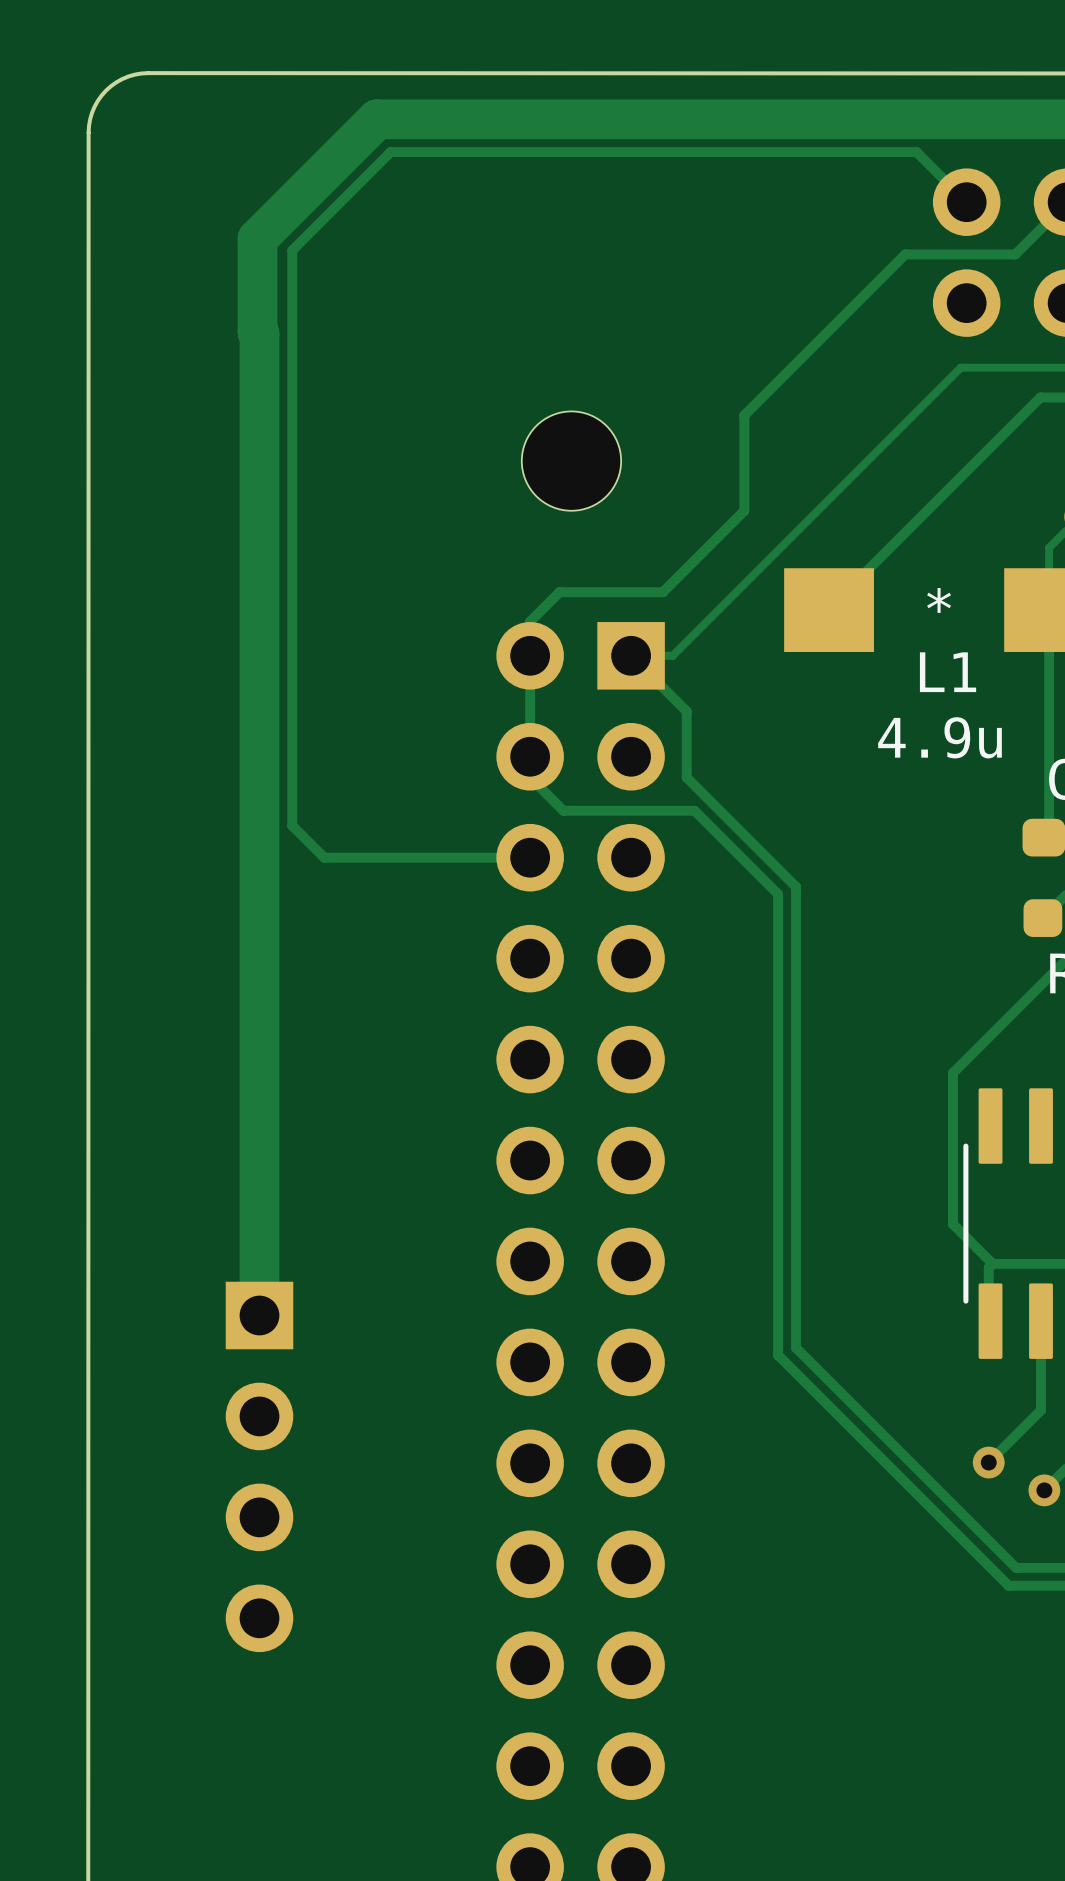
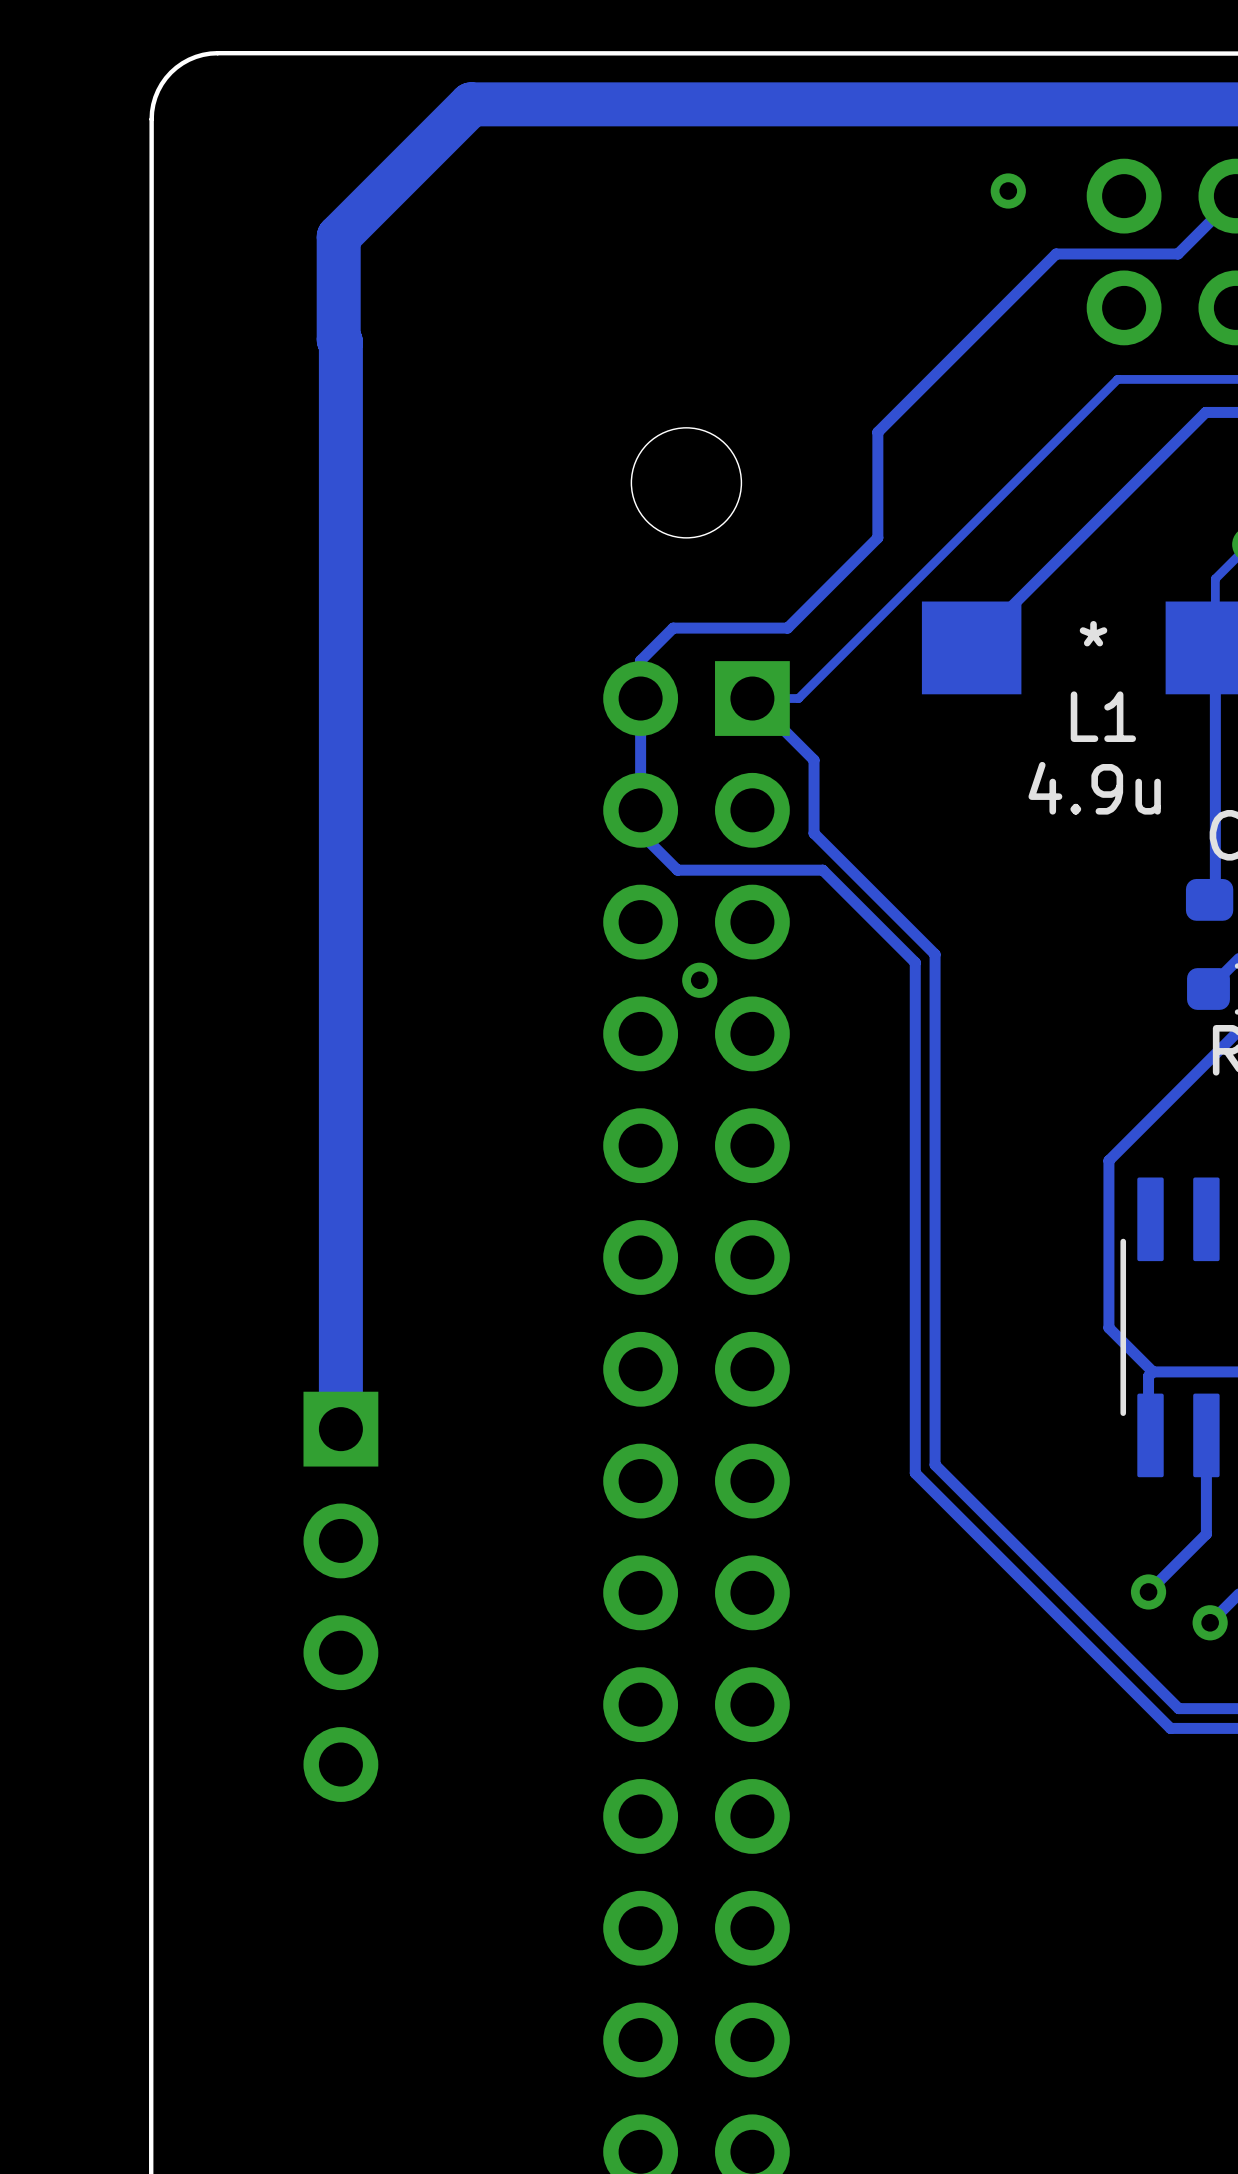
via: none -> (1008, 191)
track: (966, 202) (916, 152) (390, 152) (292, 250) (292, 825) (324, 857) (530, 857) -> none
via: none -> (699, 980)

